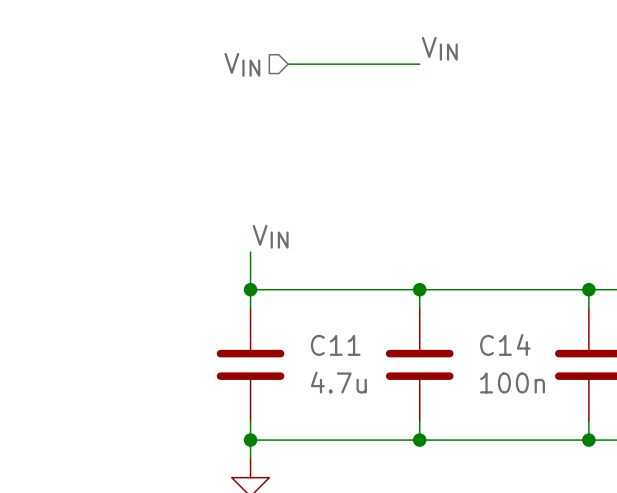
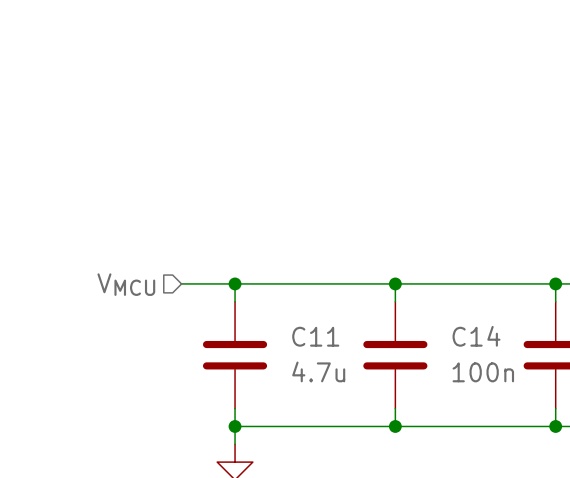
label: VIN (439, 48) -> none
hierarchical label: VIN (242, 64) -> none
wire: (288, 64) (419, 64) -> none
label: VIN (270, 236) -> none
wire: (250, 252) (250, 289) -> (181, 283) (235, 283)
hierarchical label: none -> VMCU (126, 284)

